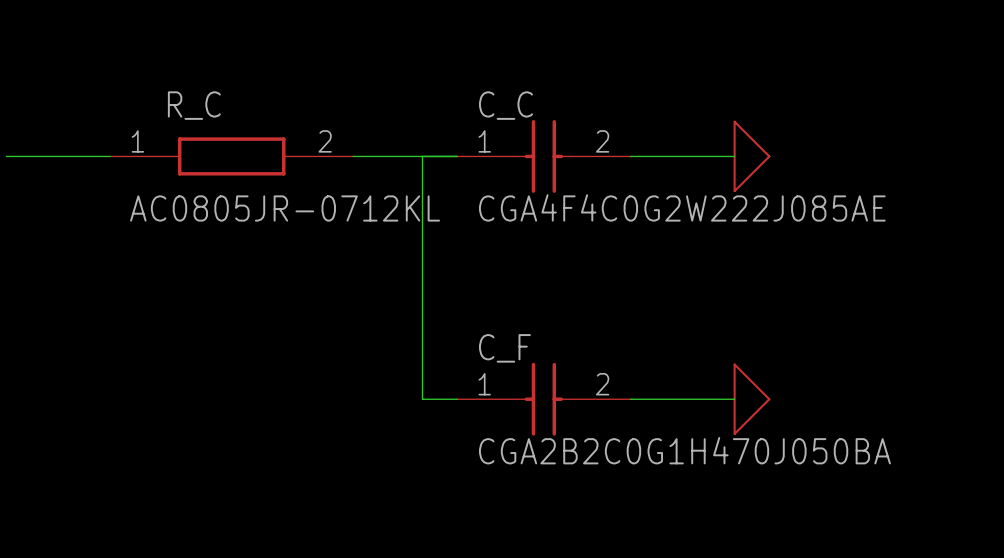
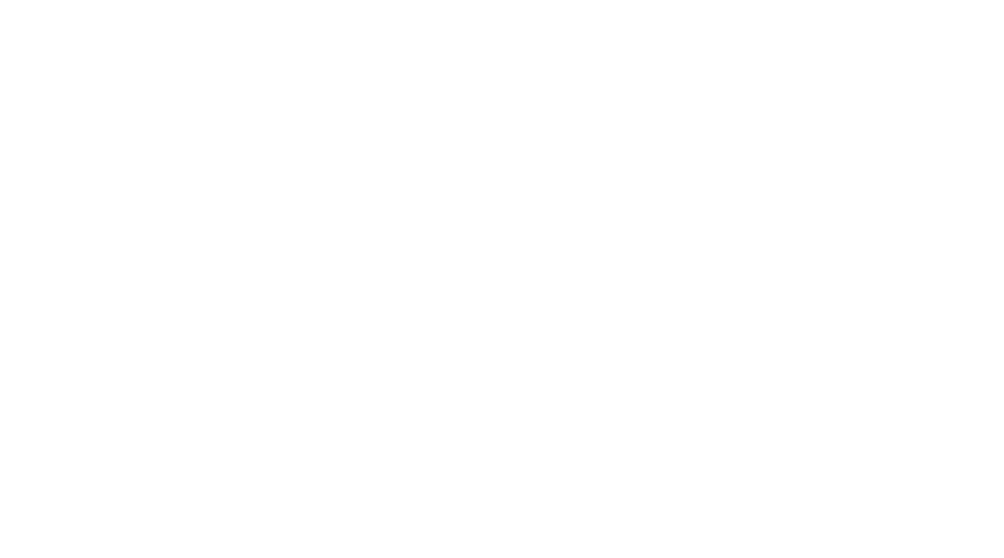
wire: (6, 156) (110, 156) -> none
R_C: AC0805JR-0712KL (231, 156) -> none
wire: (353, 156) (457, 156) -> none
wire: (422, 156) (422, 399) (457, 399) -> none
C_C: CGA4F4C0G2W222J085AE (543, 156) -> none
wire: (630, 156) (734, 156) -> none
power symbol: (751, 156) -> none
C_F: CGA2B2C0G1H470J050BA (543, 399) -> none
wire: (630, 399) (734, 399) -> none
power symbol: (751, 399) -> none

